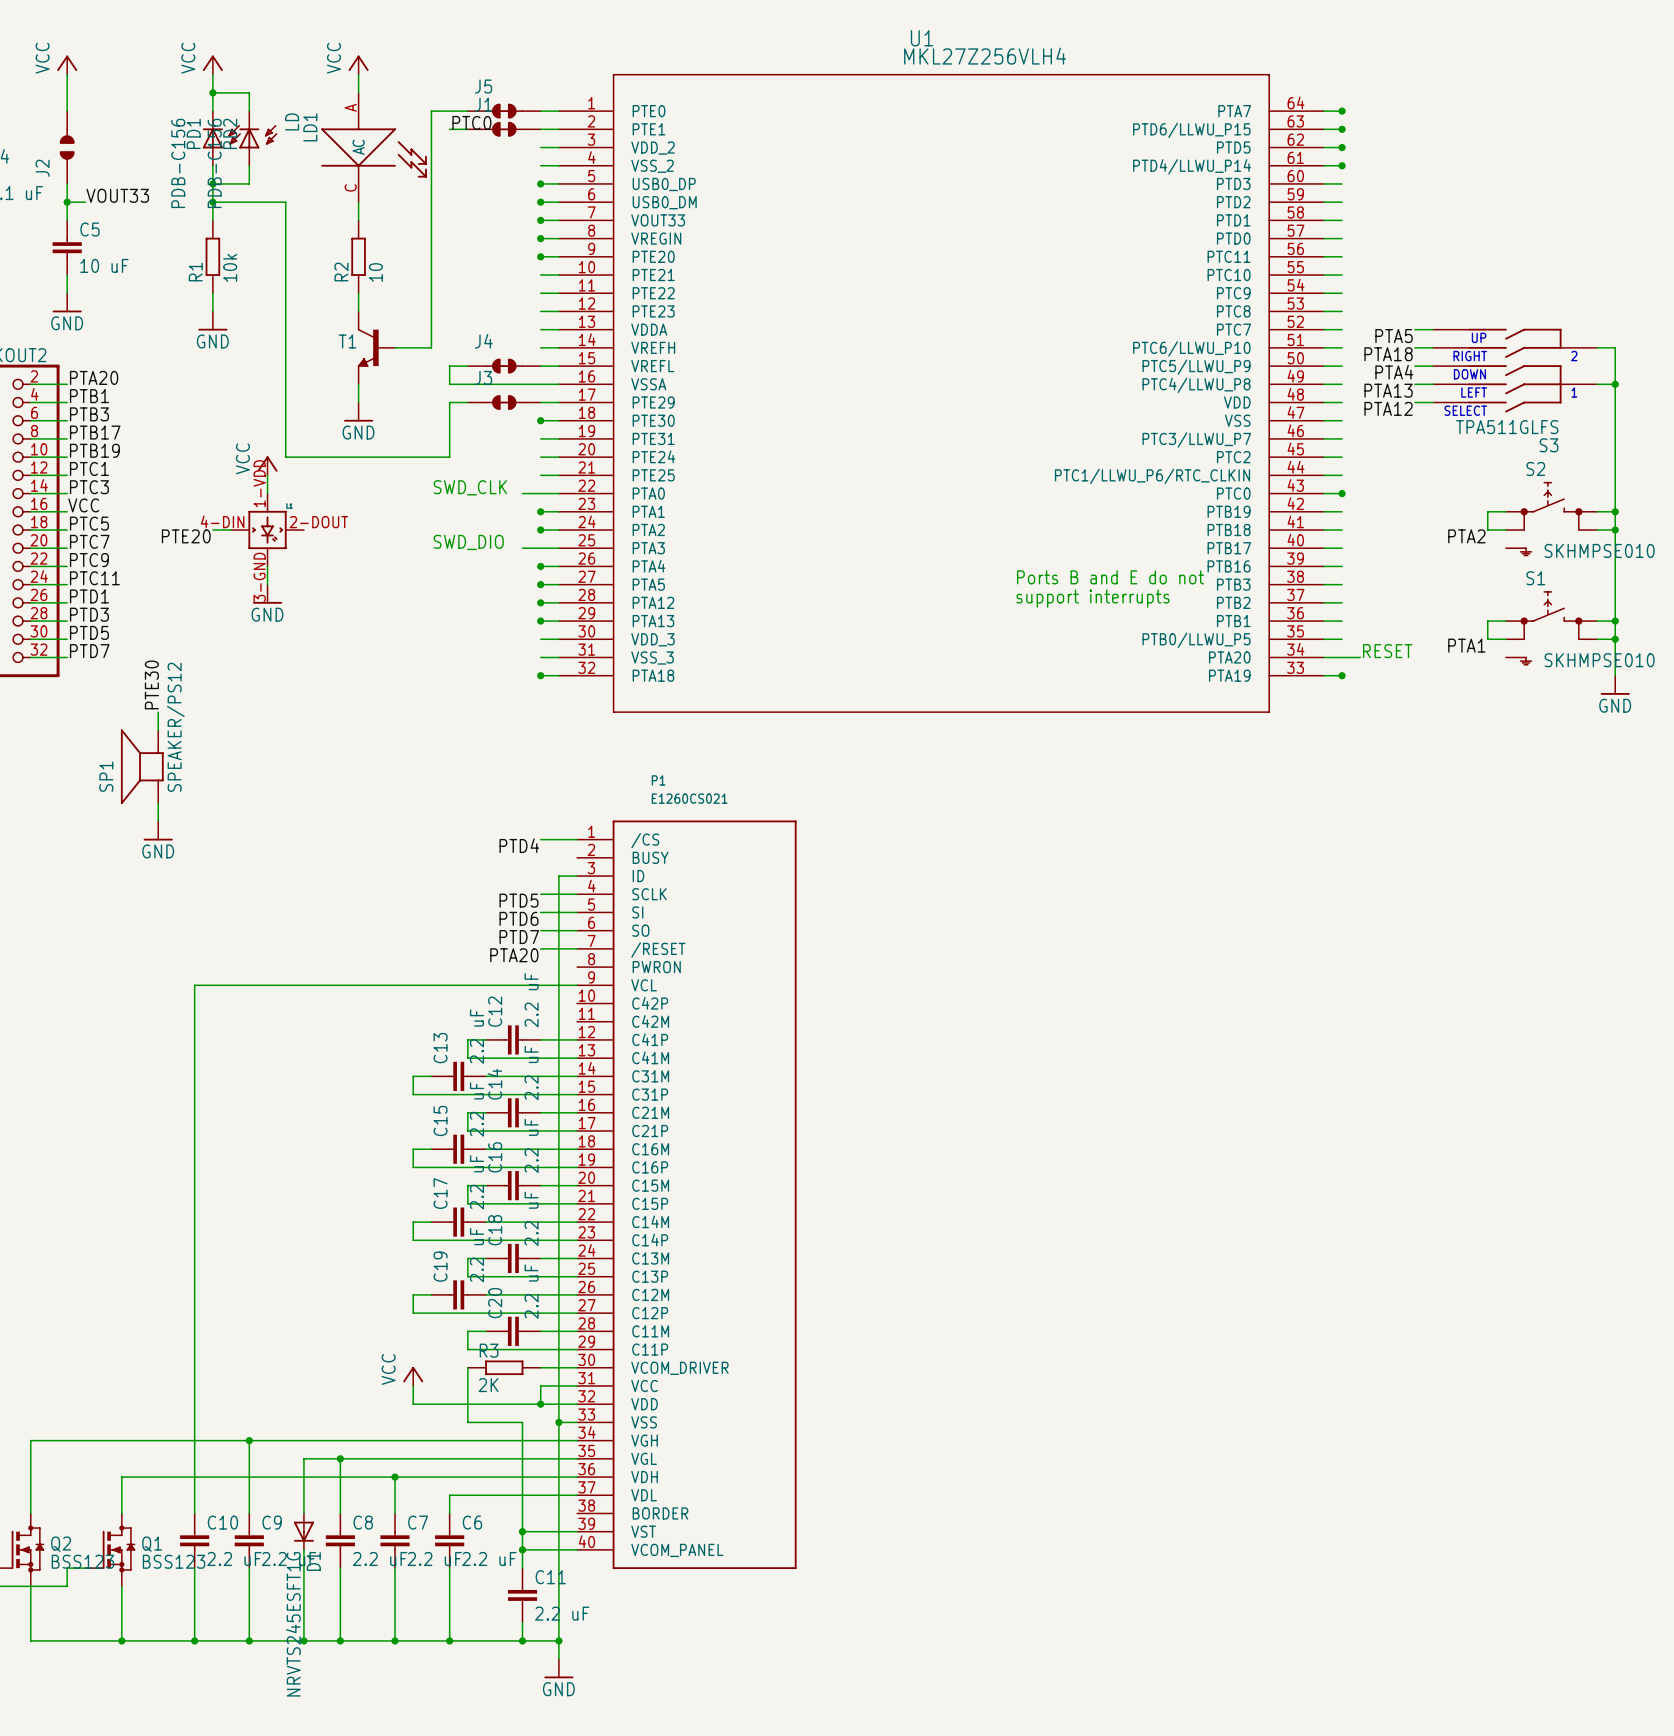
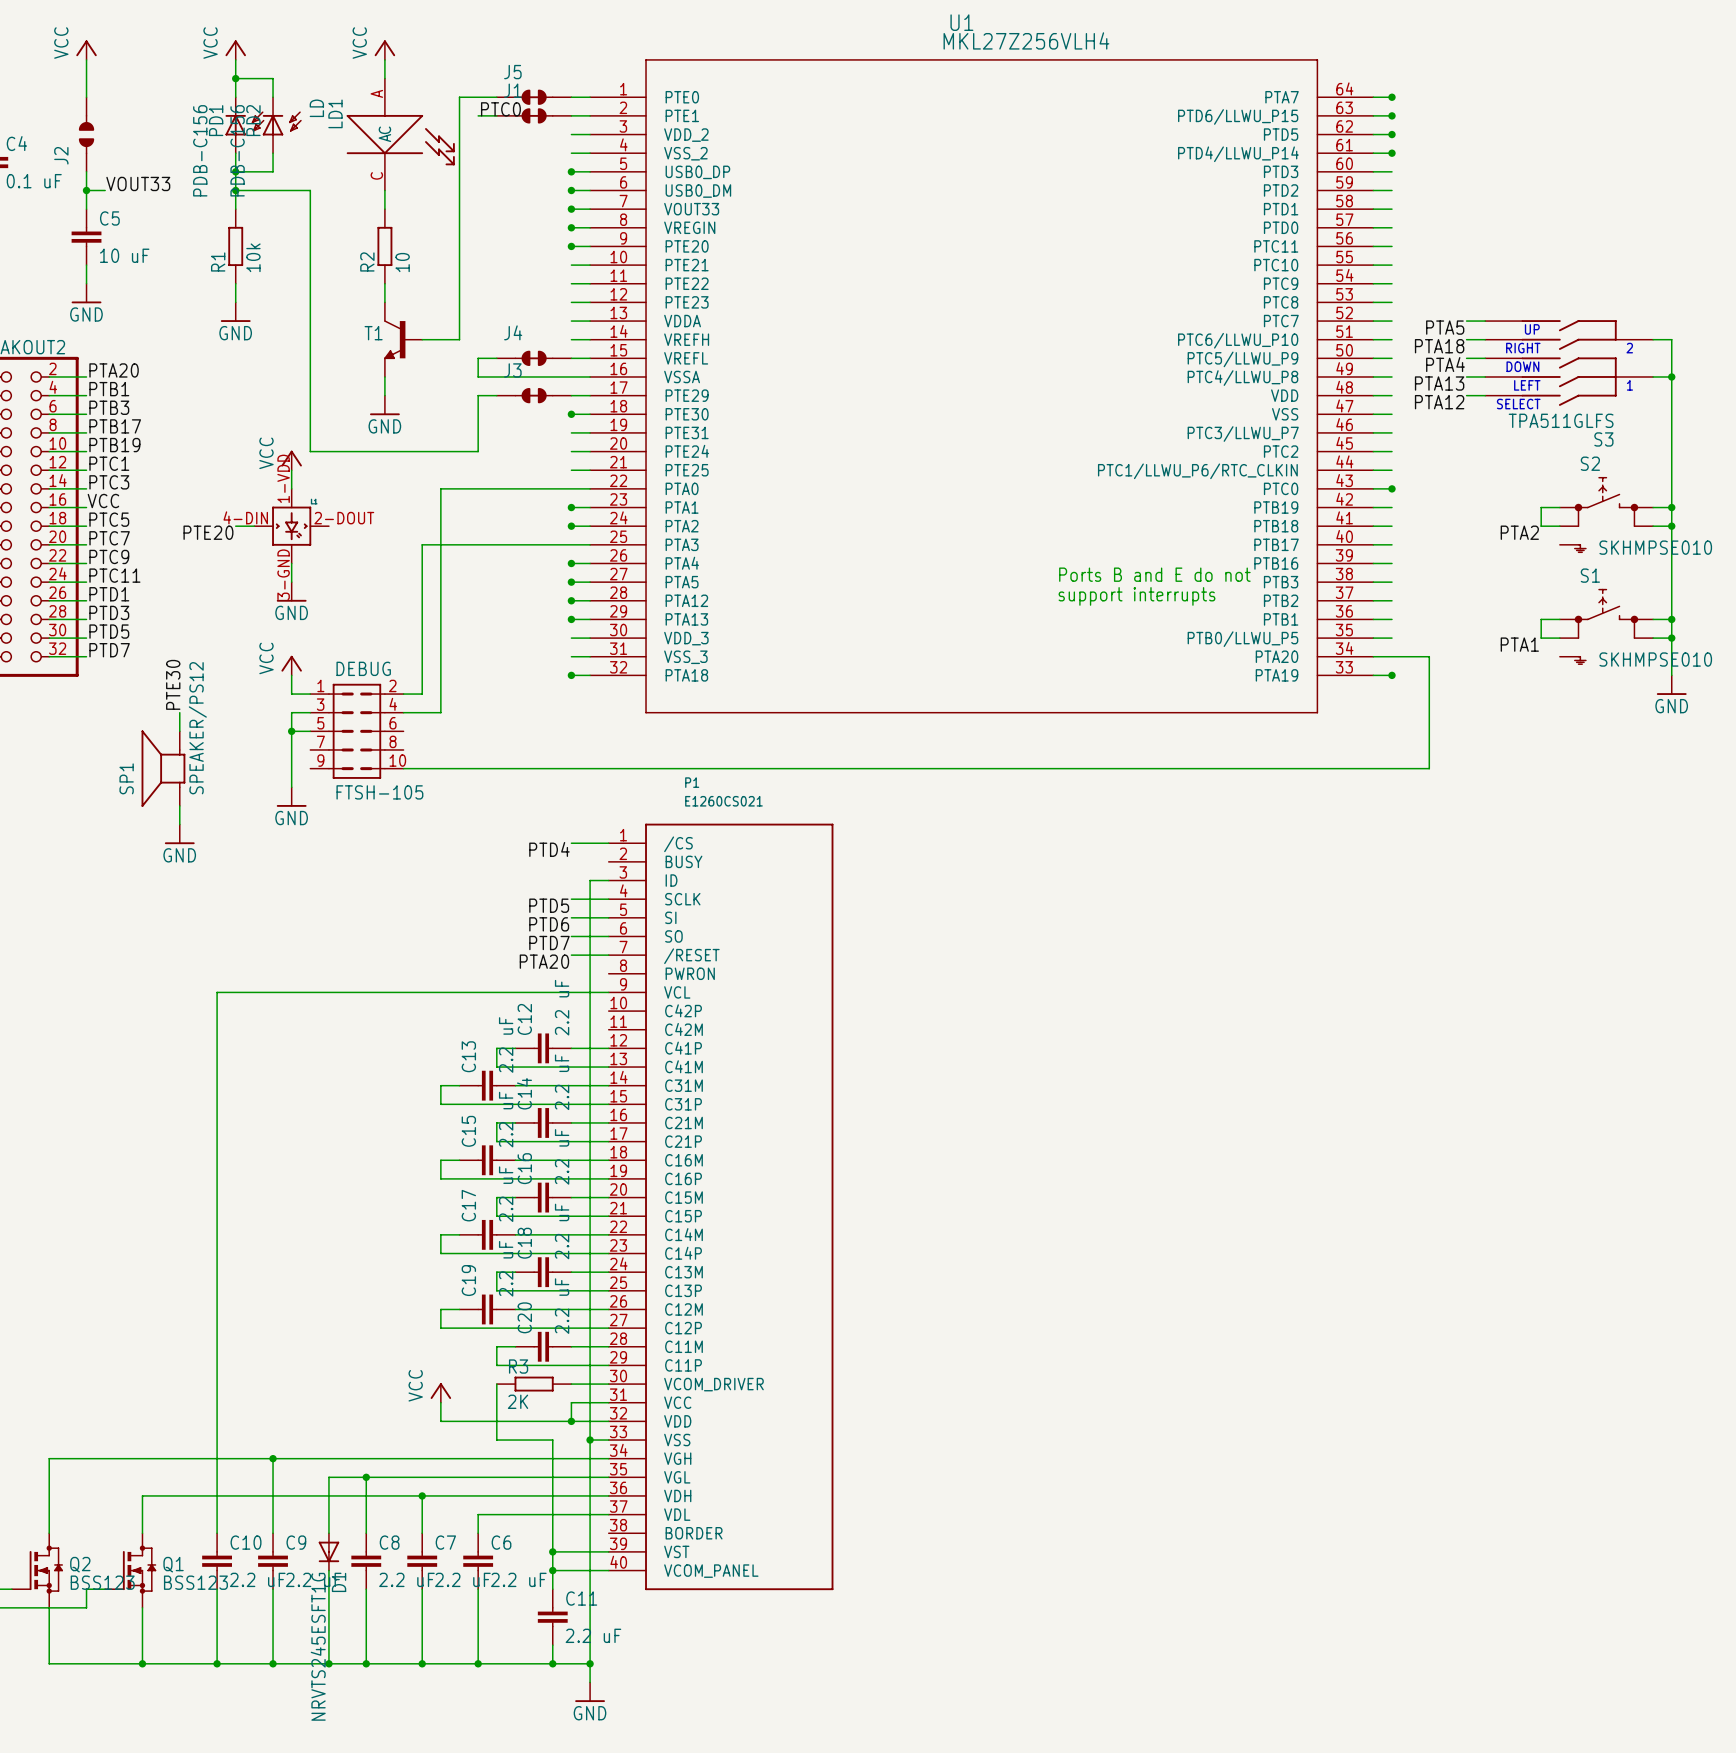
text: SWD_CLK (470, 487) -> none
wire: none -> (552, 488) (440, 488) (440, 712) (403, 712)
text: SWD_DIO (468, 542) -> none
wire: none -> (552, 544) (422, 544) (422, 694) (403, 694)
text: RESET (1387, 651) -> none
wire: none -> (1410, 656) (1429, 656) (1429, 768) (403, 768)
power symbol: none -> VCC (291, 665)
wire: none -> (291, 675) (291, 694) (310, 694)
wire: none -> (310, 712) (291, 712) (291, 787)
wire: none -> (291, 731) (310, 731)
junction: none -> (291, 731)
DEBUG: none -> FTSH-105 (356, 731)
power symbol: none -> GND (291, 797)

